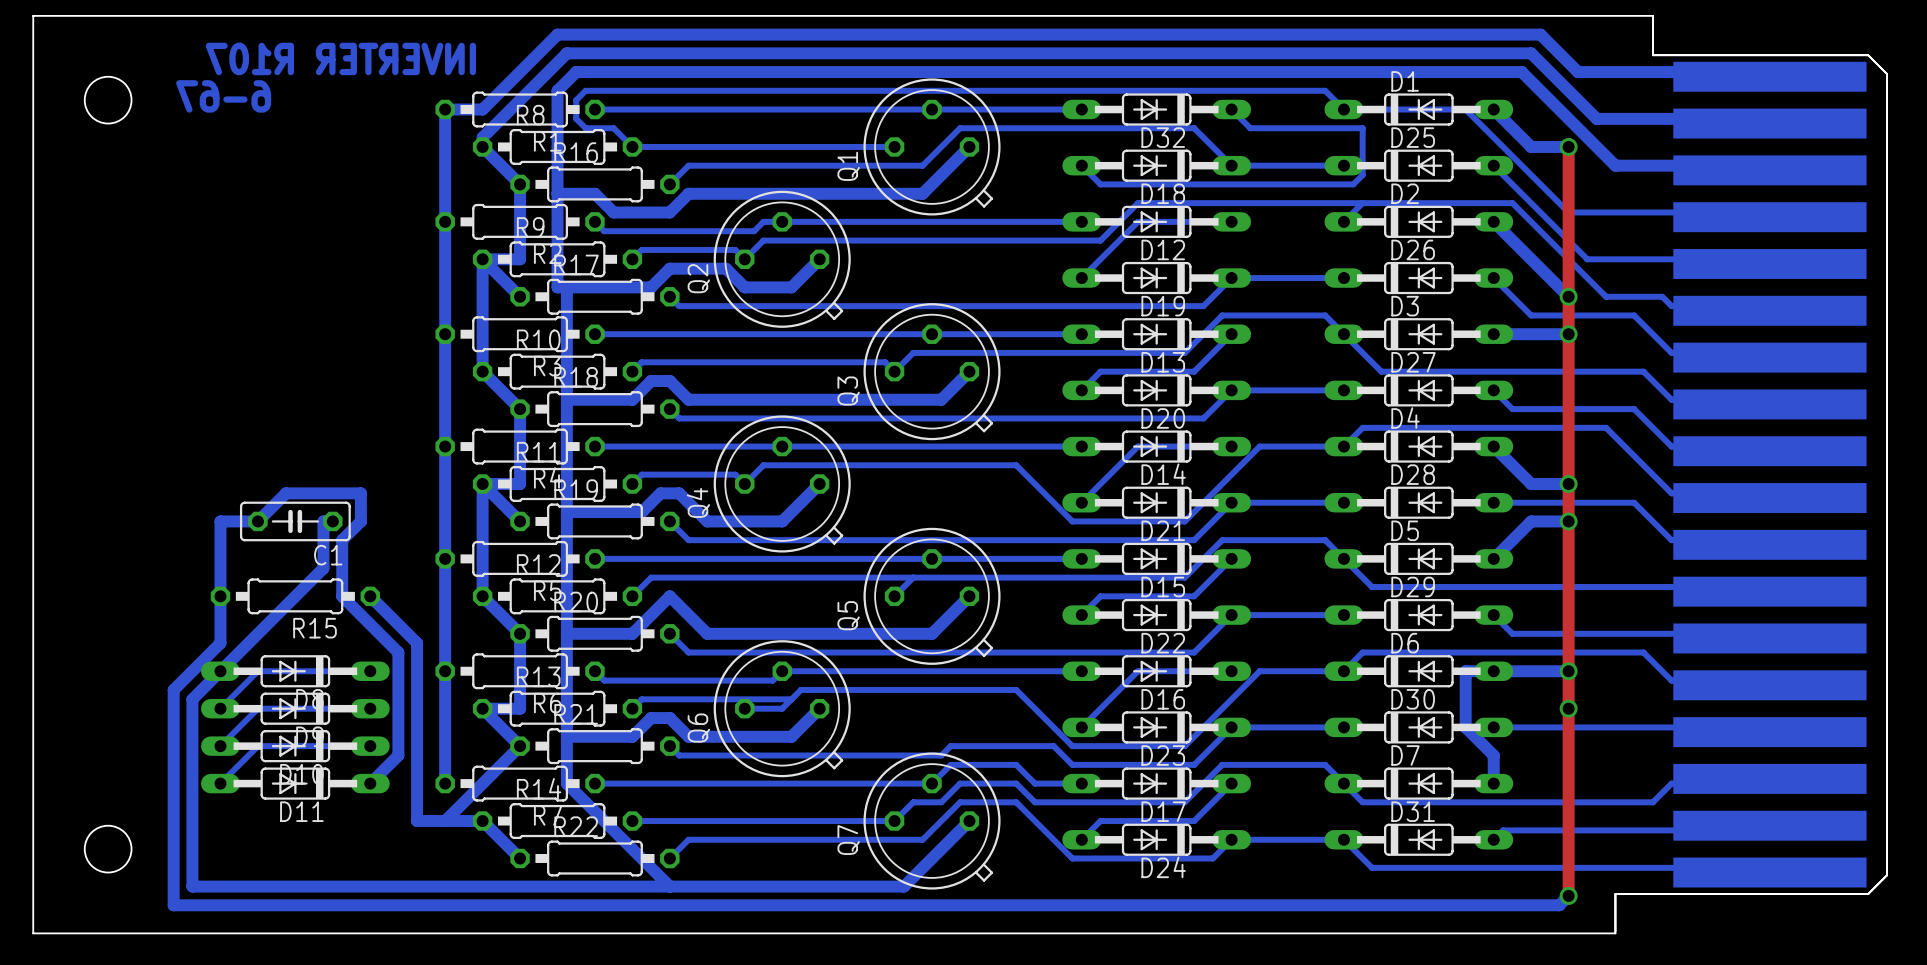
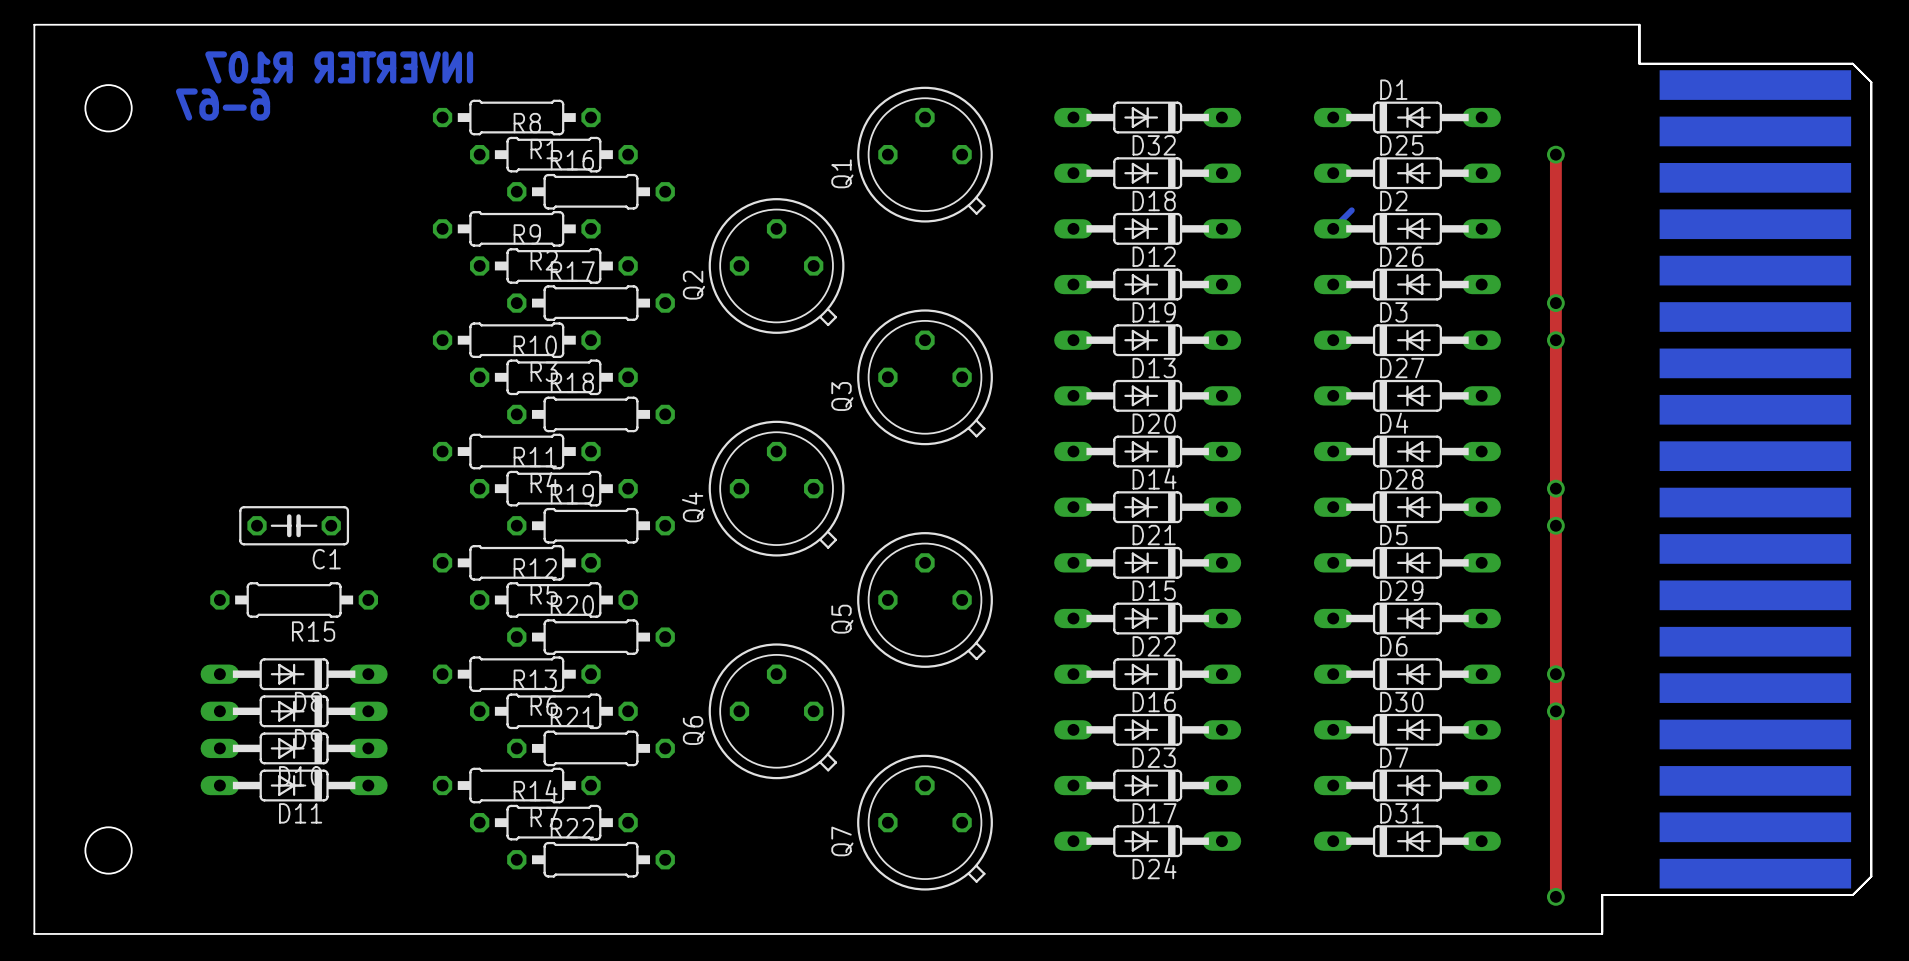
bottom track: (1769, 76) (1765, 72) (1578, 72) (1540, 34) (557, 34) (482, 109) (445, 109) (445, 783) -> none
bottom track: (594, 109) (1081, 109) -> none
bottom track: (1231, 109) (1250, 128) (1362, 128) (1362, 175) (1353, 184) (1100, 184) (1081, 165) -> none
bottom track: (1493, 109) (1531, 146) (1568, 146) -> none
bottom track: (1769, 123) (1765, 118) (1596, 118) (1531, 53) (566, 53) (482, 137) (482, 146) (520, 184) (520, 259) (482, 259) -> none
bottom track: (894, 146) (632, 146) (613, 128) (585, 128) (576, 118) (576, 100) (585, 90) (1325, 90) (1343, 109) (1465, 109) (1568, 212) (1765, 212) (1769, 217) -> none
bottom track: (969, 146) (922, 193) (688, 193) (669, 212) (613, 212) (594, 193) (557, 193) -> none
bottom track: (1343, 165) (1231, 165) (1194, 128) (960, 128) (922, 165) (688, 165) (669, 184) -> none
bottom track: (1493, 165) (1587, 259) (1765, 259) (1769, 263) -> none
bottom track: (1769, 170) (1765, 165) (1615, 165) (1521, 72) (576, 72) (557, 90) (557, 287) (651, 287) (669, 268) (726, 268) (744, 287) (791, 287) (819, 259) -> none
bottom track: (594, 221) (604, 231) (754, 231) (763, 221) (1081, 221) -> none
bottom track: (1231, 221) (1137, 221) (1081, 278) -> none
bottom track: (1493, 221) (1568, 296) -> none
bottom track: (482, 259) (520, 296) -> none
bottom track: (482, 259) (482, 371) (520, 409) (520, 484) (482, 484) -> none
bottom track: (632, 259) (641, 249) (735, 249) (744, 259) (763, 240) (1100, 240) (1137, 203) (1512, 203) (1606, 296) (1662, 296) (1671, 306) (1765, 306) (1769, 310) -> none
bottom track: (1343, 278) (1231, 278) (1203, 306) (679, 306) (669, 296) -> none
bottom track: (1493, 278) (1531, 315) (1634, 315) (1671, 352) (1765, 352) (1769, 357) -> none
bottom track: (566, 287) (566, 783) (669, 886) -> none
bottom track: (594, 334) (1081, 334) -> none
bottom track: (1231, 334) (1194, 371) (1100, 371) (1081, 390) -> none
bottom track: (1493, 334) (1568, 334) -> none
bottom track: (632, 371) (641, 362) (885, 362) (894, 371) (913, 352) (1184, 352) (1222, 315) (1325, 315) (1381, 371) (1643, 371) (1671, 399) (1765, 399) (1769, 404) -> none
bottom track: (969, 371) (941, 399) (688, 399) (669, 381) (651, 381) (632, 399) (566, 399) -> none
bottom track: (1343, 390) (1231, 390) (1203, 418) (679, 418) (669, 409) -> none
bottom track: (1493, 390) (1512, 409) (1634, 409) (1671, 446) (1765, 446) (1769, 451) -> none
bottom track: (594, 446) (1081, 446) -> none
bottom track: (1231, 446) (1137, 446) (1081, 502) -> none
bottom track: (1493, 446) (1531, 484) (1568, 484) -> none
bottom track: (482, 484) (482, 596) (520, 633) (520, 708) (482, 708) (520, 746) (445, 821) -> none
bottom track: (482, 484) (520, 521) -> none
bottom track: (632, 484) (641, 474) (735, 474) (744, 484) (763, 465) (1016, 465) (1072, 521) (1184, 521) (1259, 446) (1343, 446) (1362, 427) (1606, 427) (1671, 493) (1765, 493) (1769, 498) -> none
bottom track: (819, 484) (782, 521) (707, 521) (679, 493) (660, 493) (641, 512) (566, 512) -> none
bottom track: (1343, 502) (1231, 502) (1194, 540) (688, 540) (669, 521) -> none
bottom track: (1493, 502) (1634, 502) (1671, 540) (1765, 540) (1769, 544) -> none
bottom track: (332, 521) (323, 521) (323, 568) (192, 699) (192, 886) (903, 886) (969, 821) -> none
bottom track: (1568, 521) (1531, 521) (1493, 558) -> none
bottom track: (594, 558) (1081, 558) -> none
bottom track: (1231, 558) (1194, 596) (1100, 596) (1081, 615) -> none
bottom track: (913, 577) (894, 596) -> none
bottom track: (1769, 591) (1765, 586) (1372, 586) (1325, 540) (1222, 540) (1184, 577) (651, 577) (632, 596) -> none
bottom track: (370, 596) (417, 643) (417, 821) (482, 821) (520, 858) -> none
bottom track: (969, 596) (932, 633) (707, 633) (669, 596) (632, 633) (566, 633) -> none
bottom track: (1343, 615) (1231, 615) (1194, 652) (688, 652) (669, 633) -> none
bottom track: (1493, 615) (1512, 633) (1765, 633) (1769, 638) -> none
bottom track: (370, 671) (257, 671) (220, 708) -> none
bottom track: (594, 671) (604, 680) (772, 680) (782, 671) (1081, 671) -> none
bottom track: (1231, 671) (1137, 671) (1081, 727) -> none
bottom track: (1568, 671) (1465, 671) (1465, 727) (1493, 755) (1493, 783) -> none
bottom track: (1769, 685) (1765, 680) (1671, 680) (1643, 652) (1362, 652) (1343, 671) (1259, 671) (1184, 746) (1072, 746) (1016, 689) (800, 689) (782, 708) (744, 708) -> none
bottom track: (791, 699) (641, 699) (632, 708) -> none
bottom track: (370, 708) (257, 708) (220, 746) -> none
bottom track: (819, 708) (791, 736) (688, 736) (669, 718) (651, 718) (632, 736) (566, 736) -> none
bottom track: (1343, 727) (1231, 727) (1194, 764) (1072, 764) (1053, 746) (950, 746) (941, 755) (679, 755) (669, 746) -> none
bottom track: (1493, 727) (1765, 727) (1769, 732) -> none
bottom track: (370, 746) (257, 746) (220, 783) -> none
bottom track: (1769, 778) (1765, 783) (1671, 783) (1652, 802) (1362, 802) (1325, 764) (1222, 764) (1184, 802) (1034, 802) (1016, 783) (960, 783) (941, 802) (913, 802) (894, 821) (632, 821) -> none
bottom track: (370, 783) (398, 755) (398, 652) (342, 596) (342, 540) (360, 521) (360, 493) (286, 493) (257, 521) (220, 521) (220, 643) (173, 689) (173, 905) (1559, 905) (1568, 895) -> none
bottom track: (594, 783) (932, 783) (950, 764) (1016, 764) (1034, 783) (1081, 783) -> none
bottom track: (1231, 783) (1194, 821) (1100, 821) (1081, 839) -> none
bottom track: (1769, 825) (1765, 830) (1503, 830) (1493, 839) -> none
bottom track: (669, 858) (688, 839) (922, 839) (960, 802) (1016, 802) (1072, 858) (1212, 858) (1231, 839) (1343, 839) (1372, 867) (1765, 867) (1769, 872) -> none

